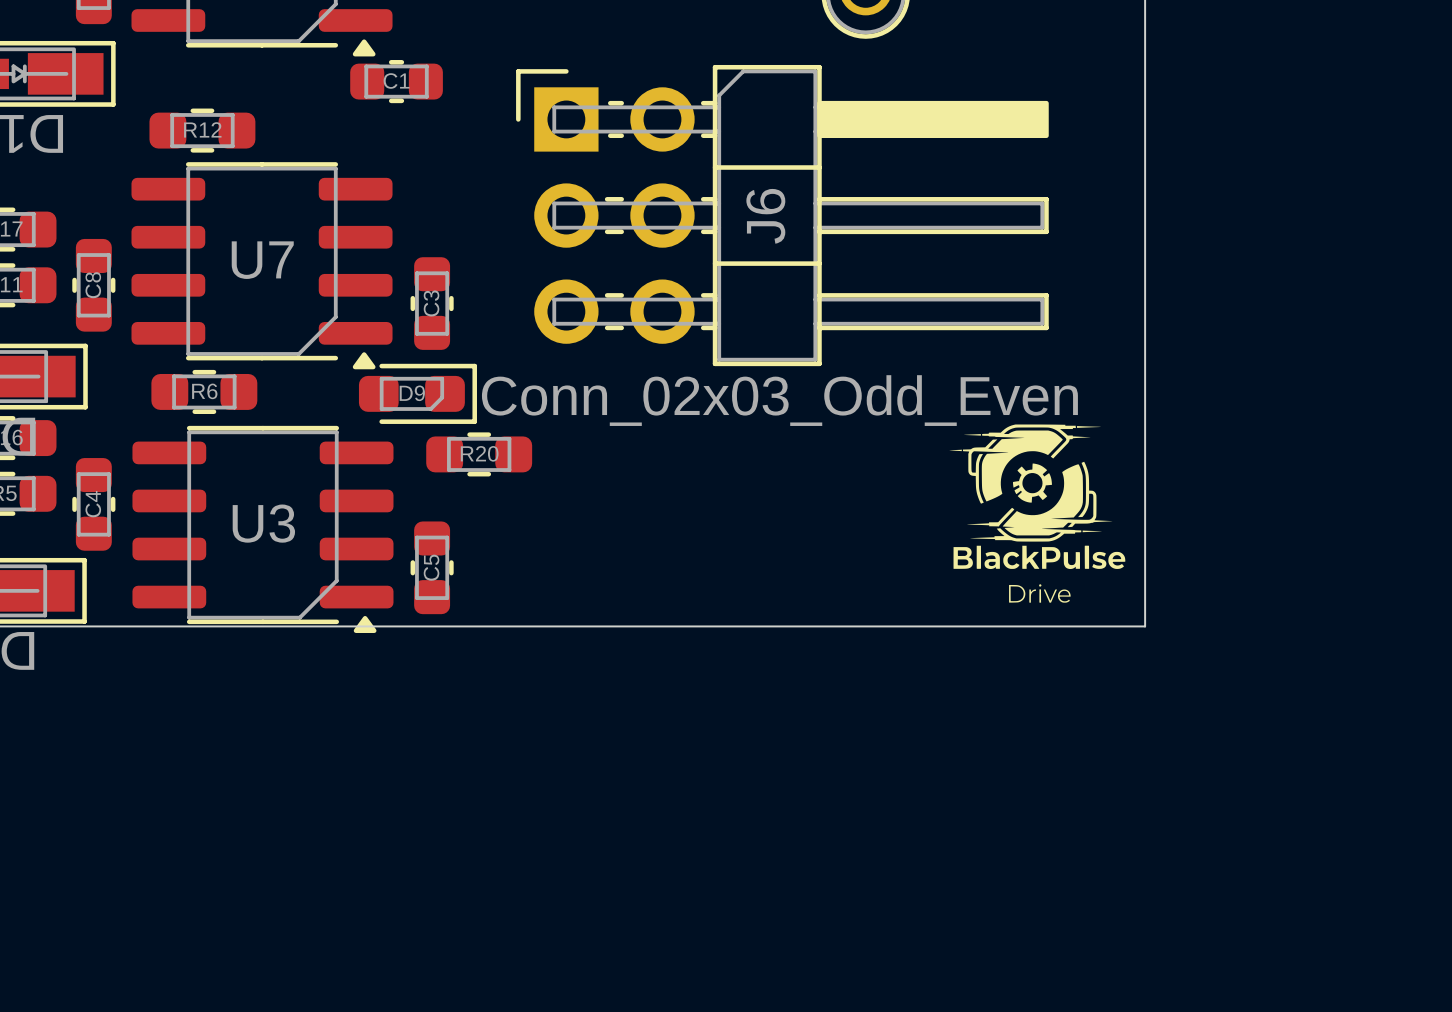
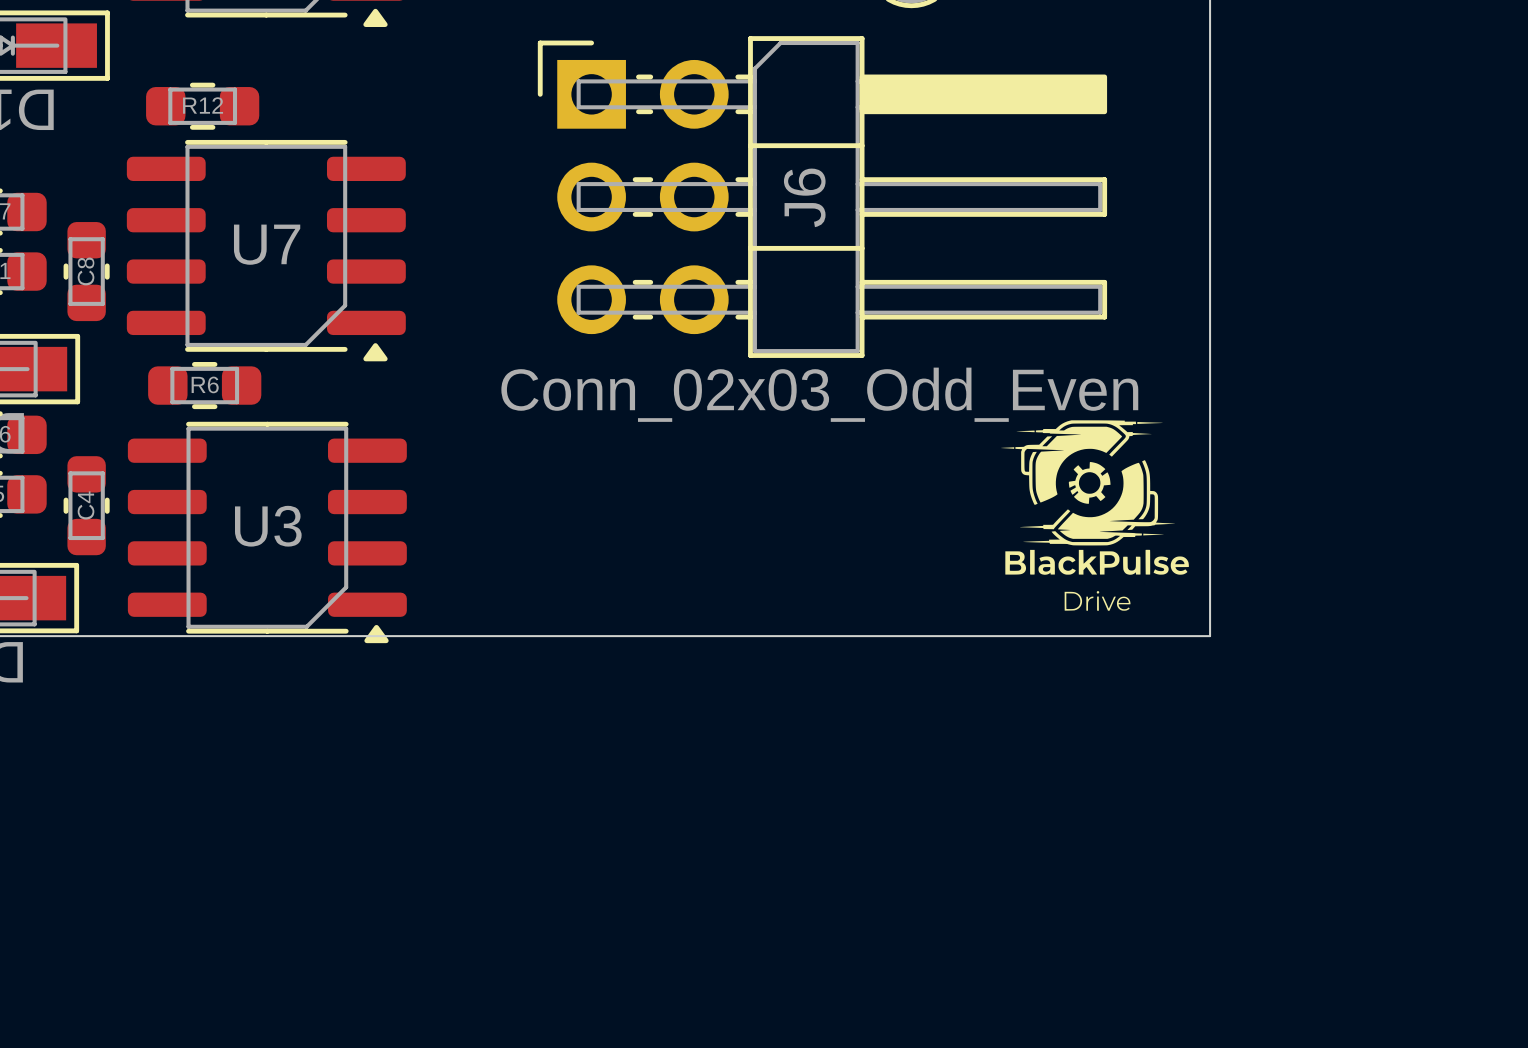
C1: (396, 81) -> none
C3: (432, 303) -> none
D9: (417, 393) -> none
R20: (479, 454) -> none
C5: (432, 567) -> none

